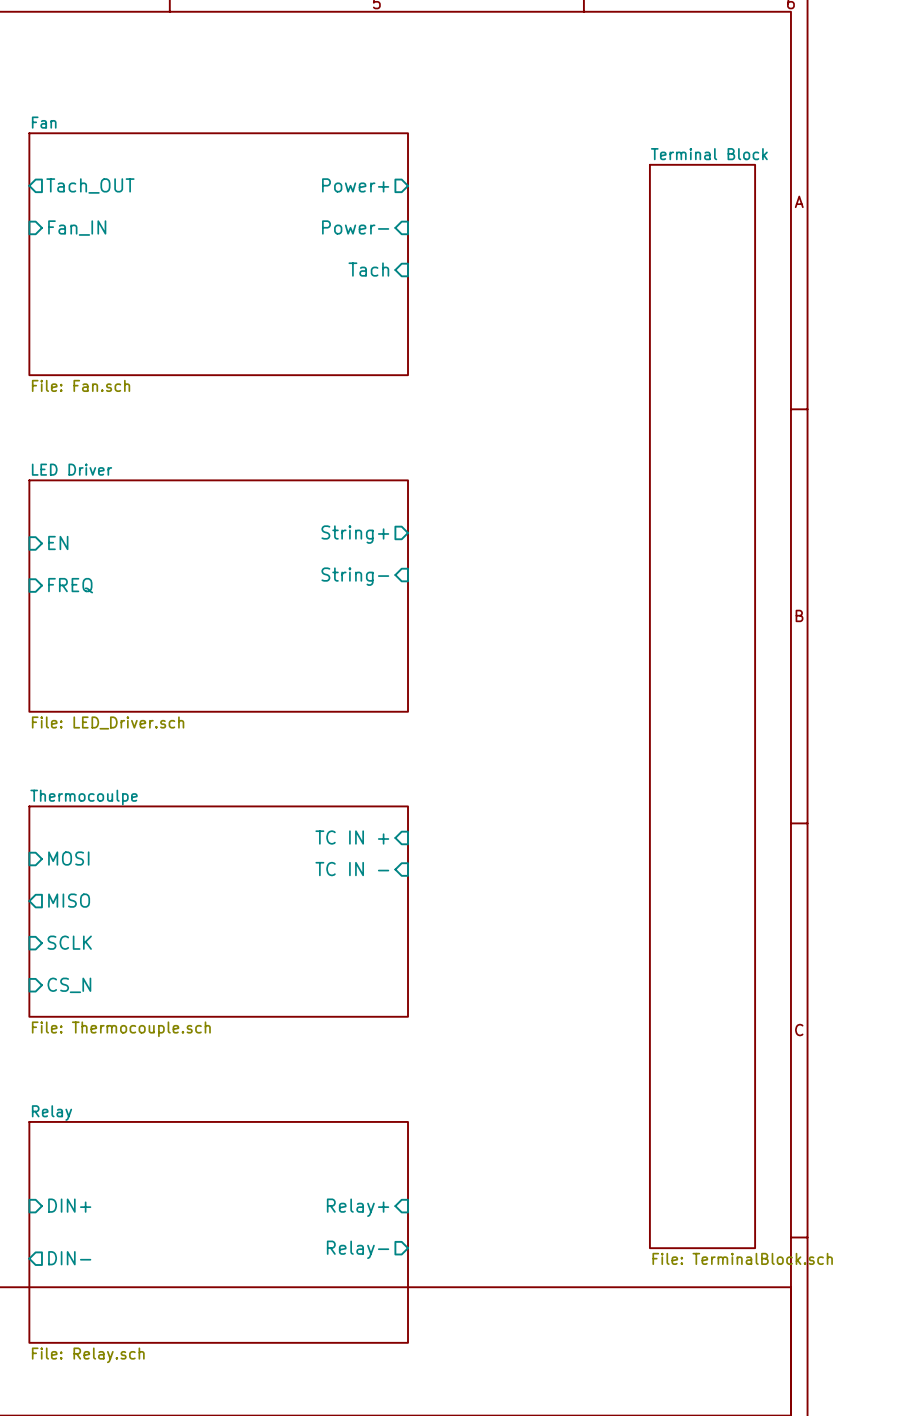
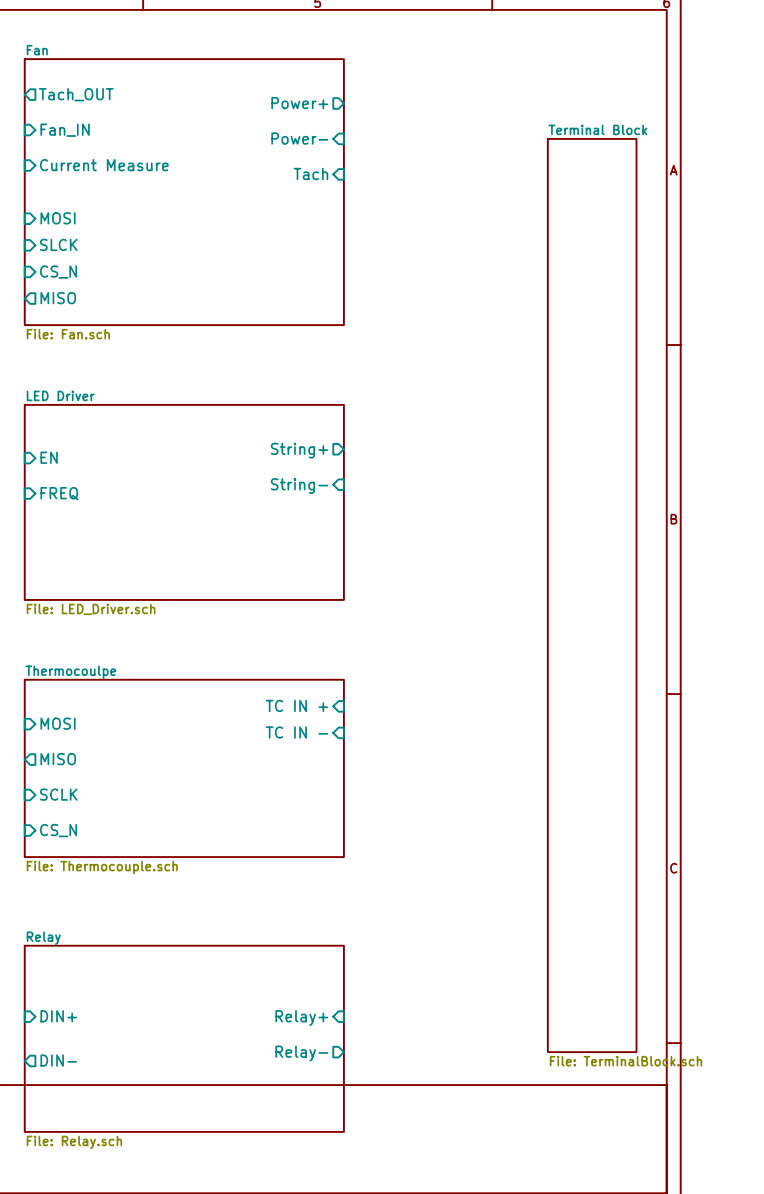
sheet pin position: Tach_OUT (90, 185) -> Tach_OUT (76, 94)
sheet pin position: Power+ (355, 185) -> Power+ (299, 103)
sheet pin: none -> Current Measure (104, 165)
sheet Fan: none -> File: Fan.sch (184, 192)
sheet pin position: Power- (355, 227) -> Power- (299, 138)
sheet pin position: Fan_IN (77, 228) -> Fan_IN (65, 130)
sheet Fan: File: Fan.sch (218, 254) -> none
sheet pin: none -> MOSI (58, 218)
sheet pin position: Tach (368, 269) -> Tach (310, 174)
sheet pin: none -> SLCK (58, 244)
sheet pin: none -> CS_N (58, 272)
sheet pin: none -> MISO (58, 298)

